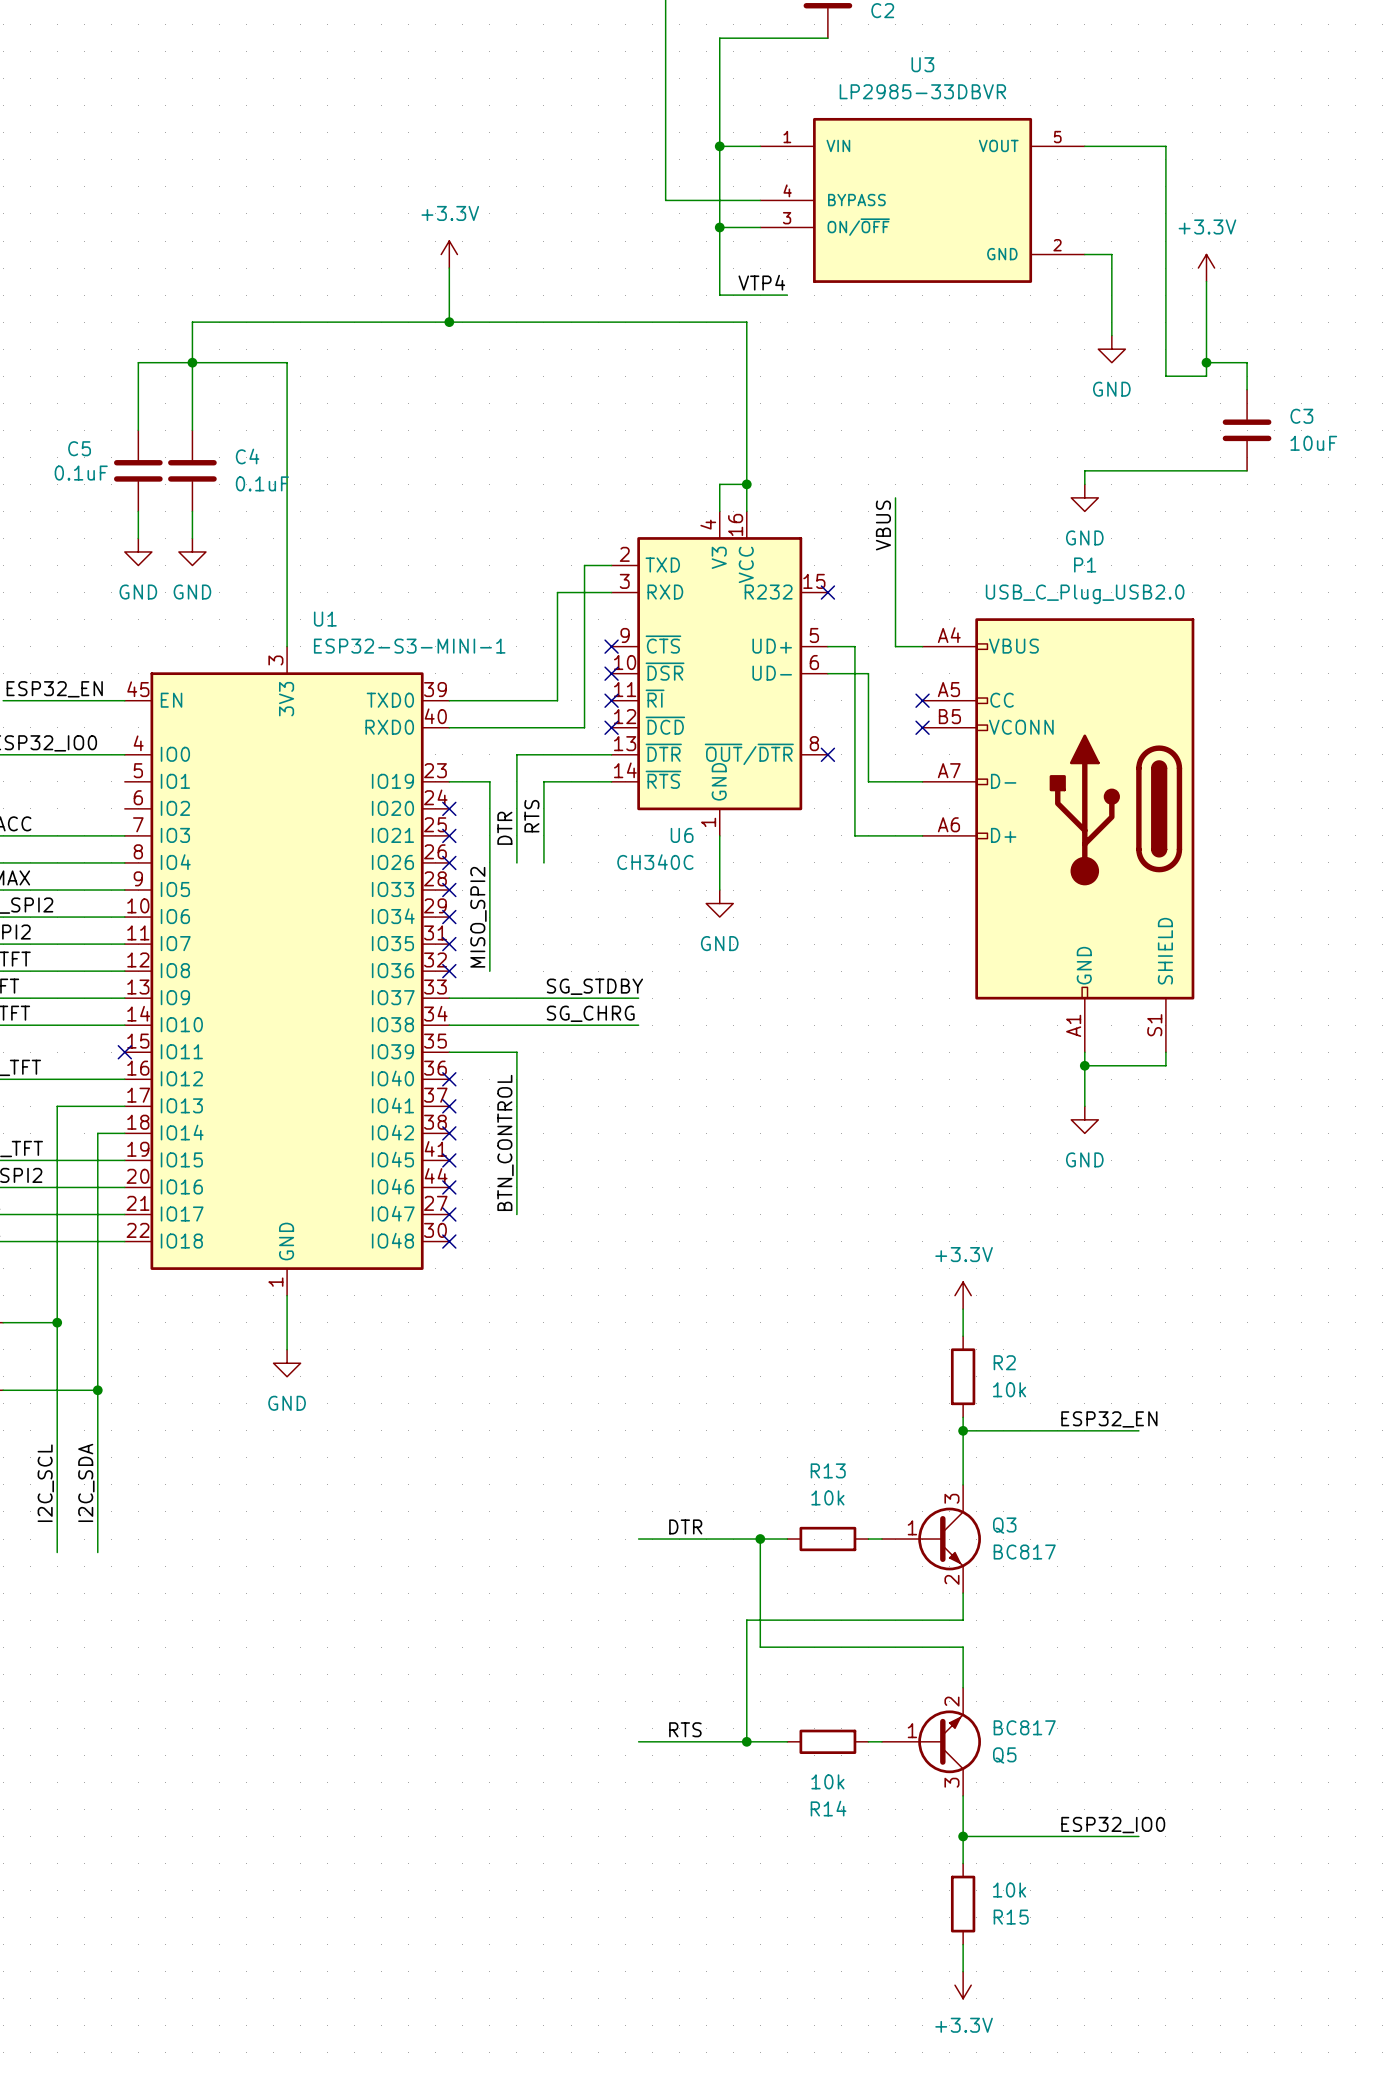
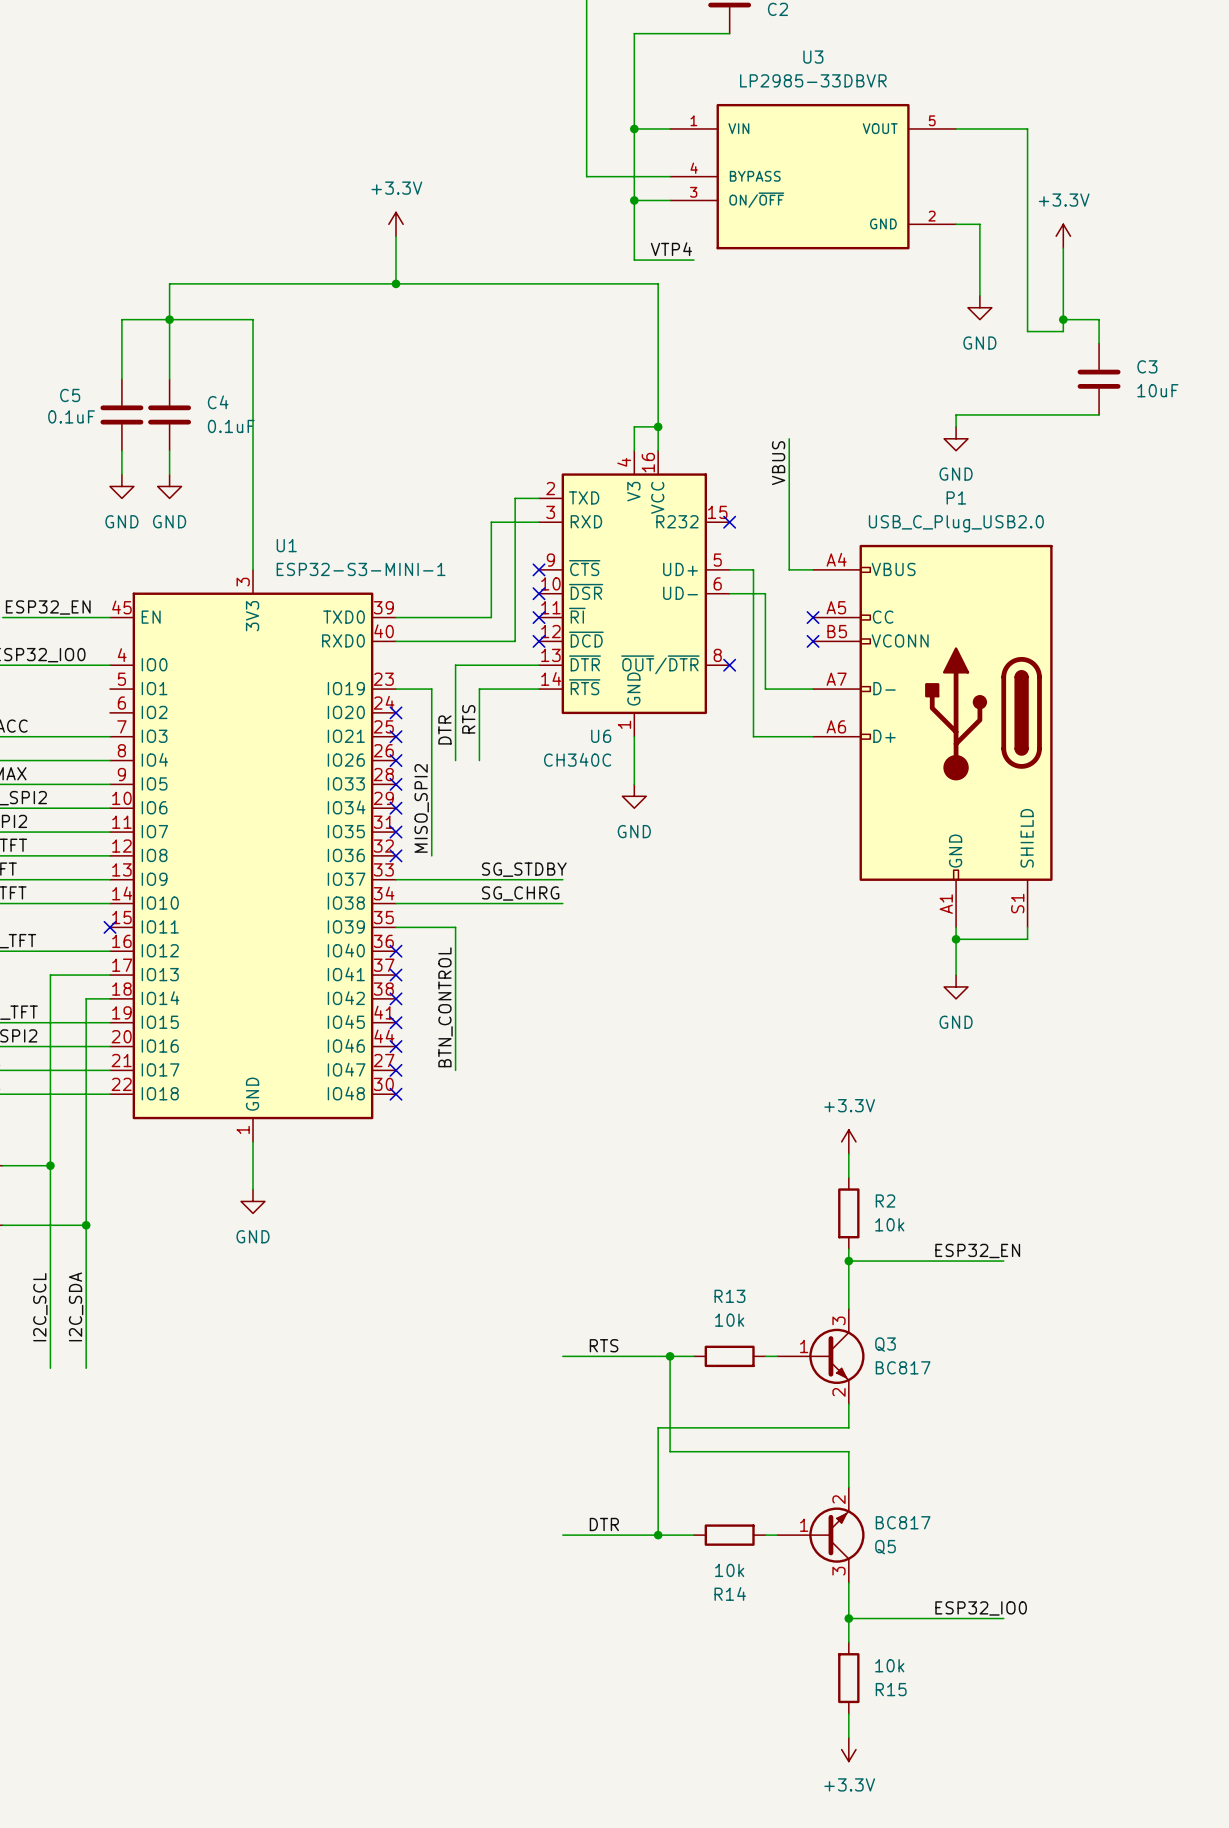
label: DTR (685, 1526) -> RTS (604, 1345)
label: RTS (685, 1729) -> DTR (604, 1524)

